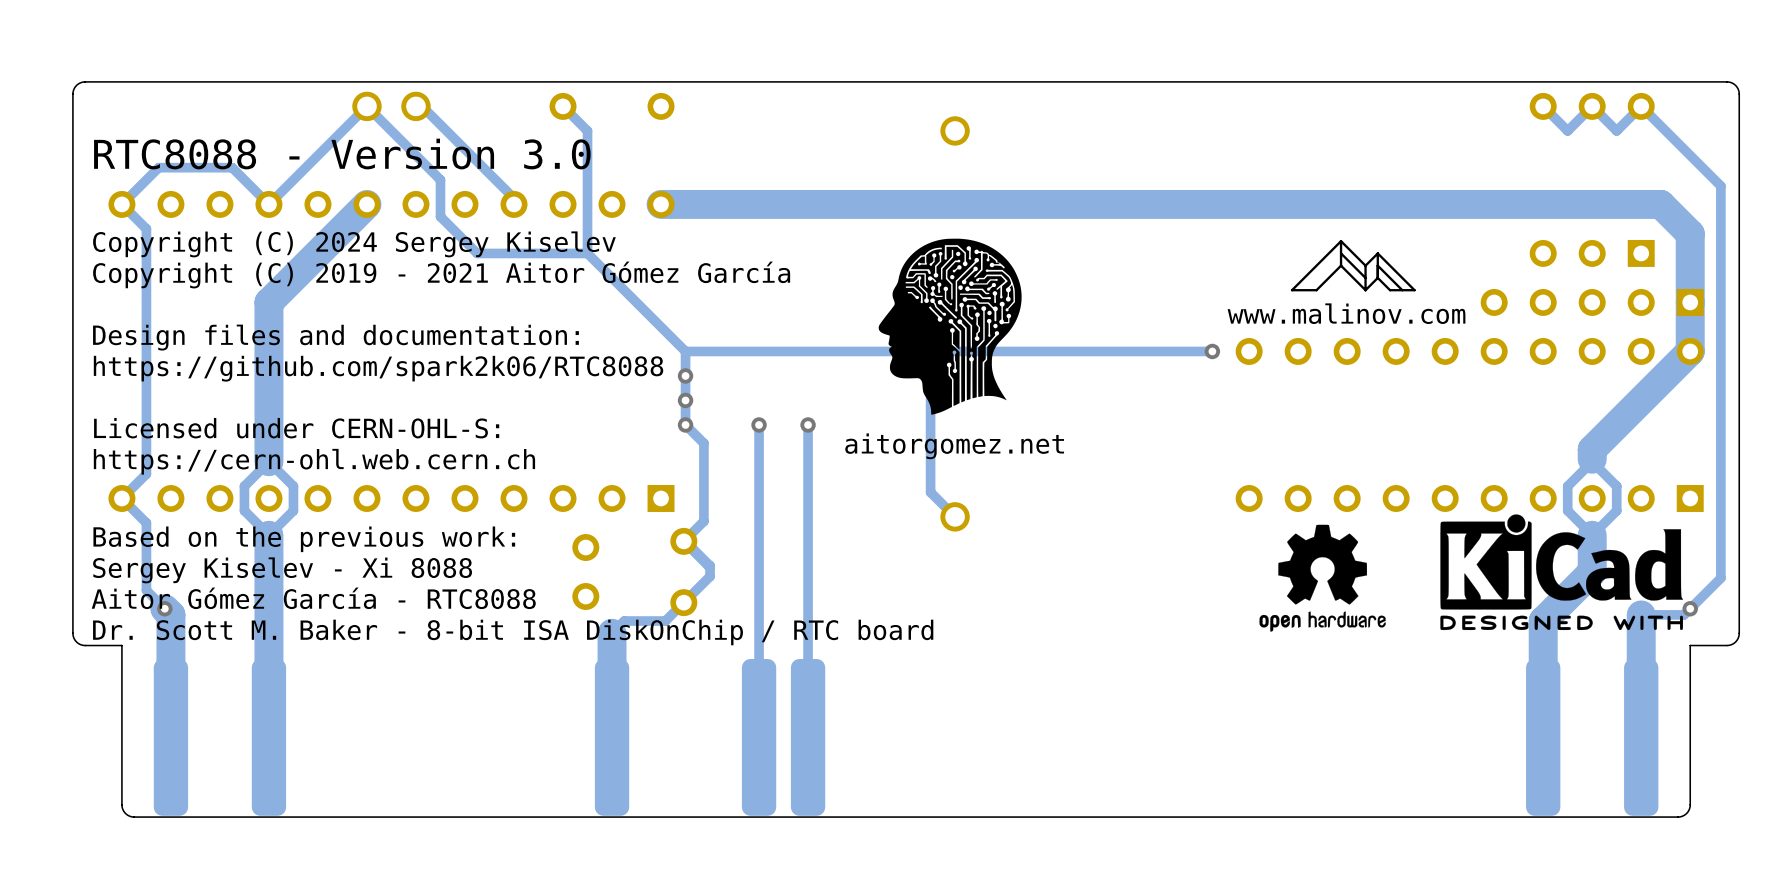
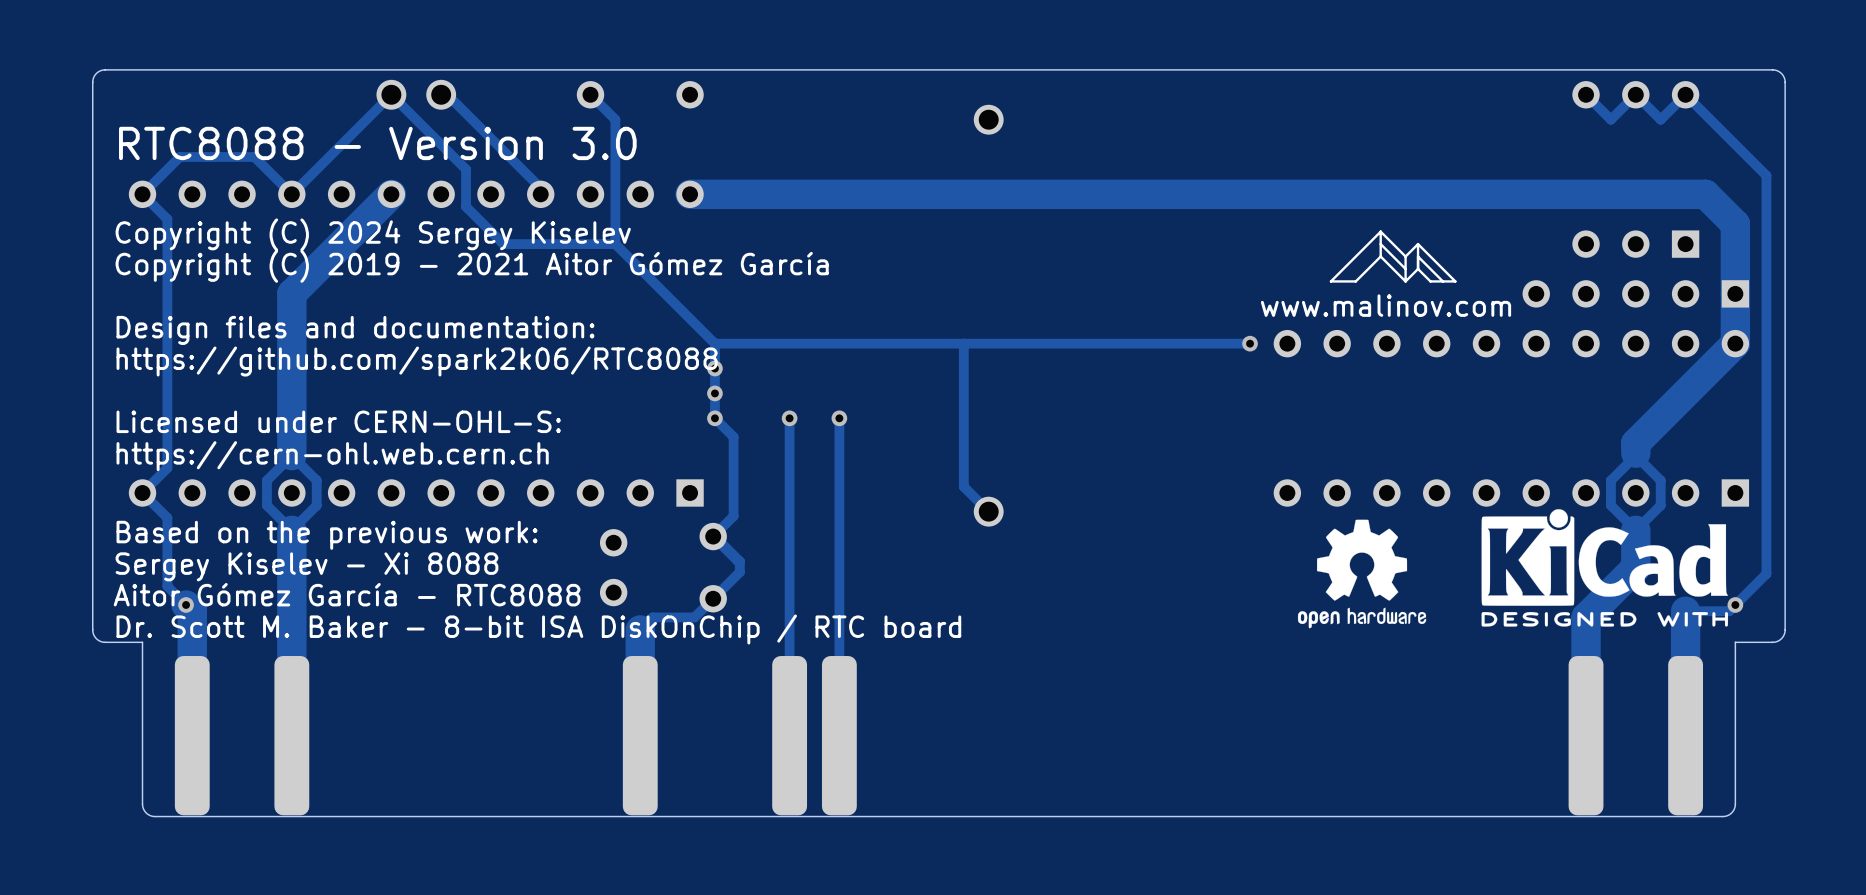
drawing: [878, 238, 1022, 415] -> none
text: aitorgomez.net (954, 446) -> none

